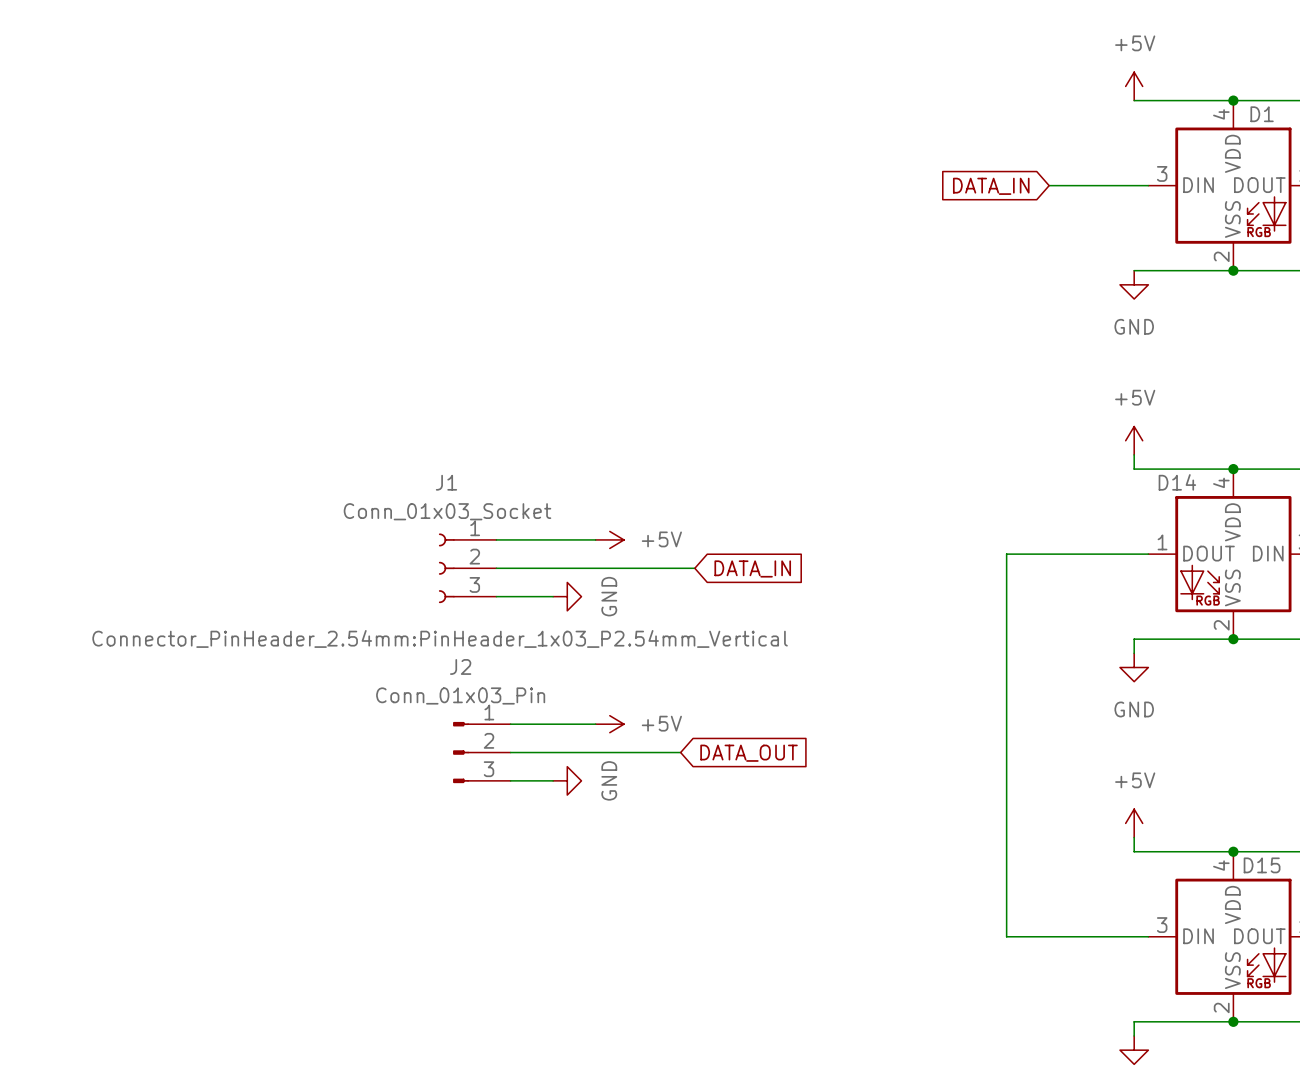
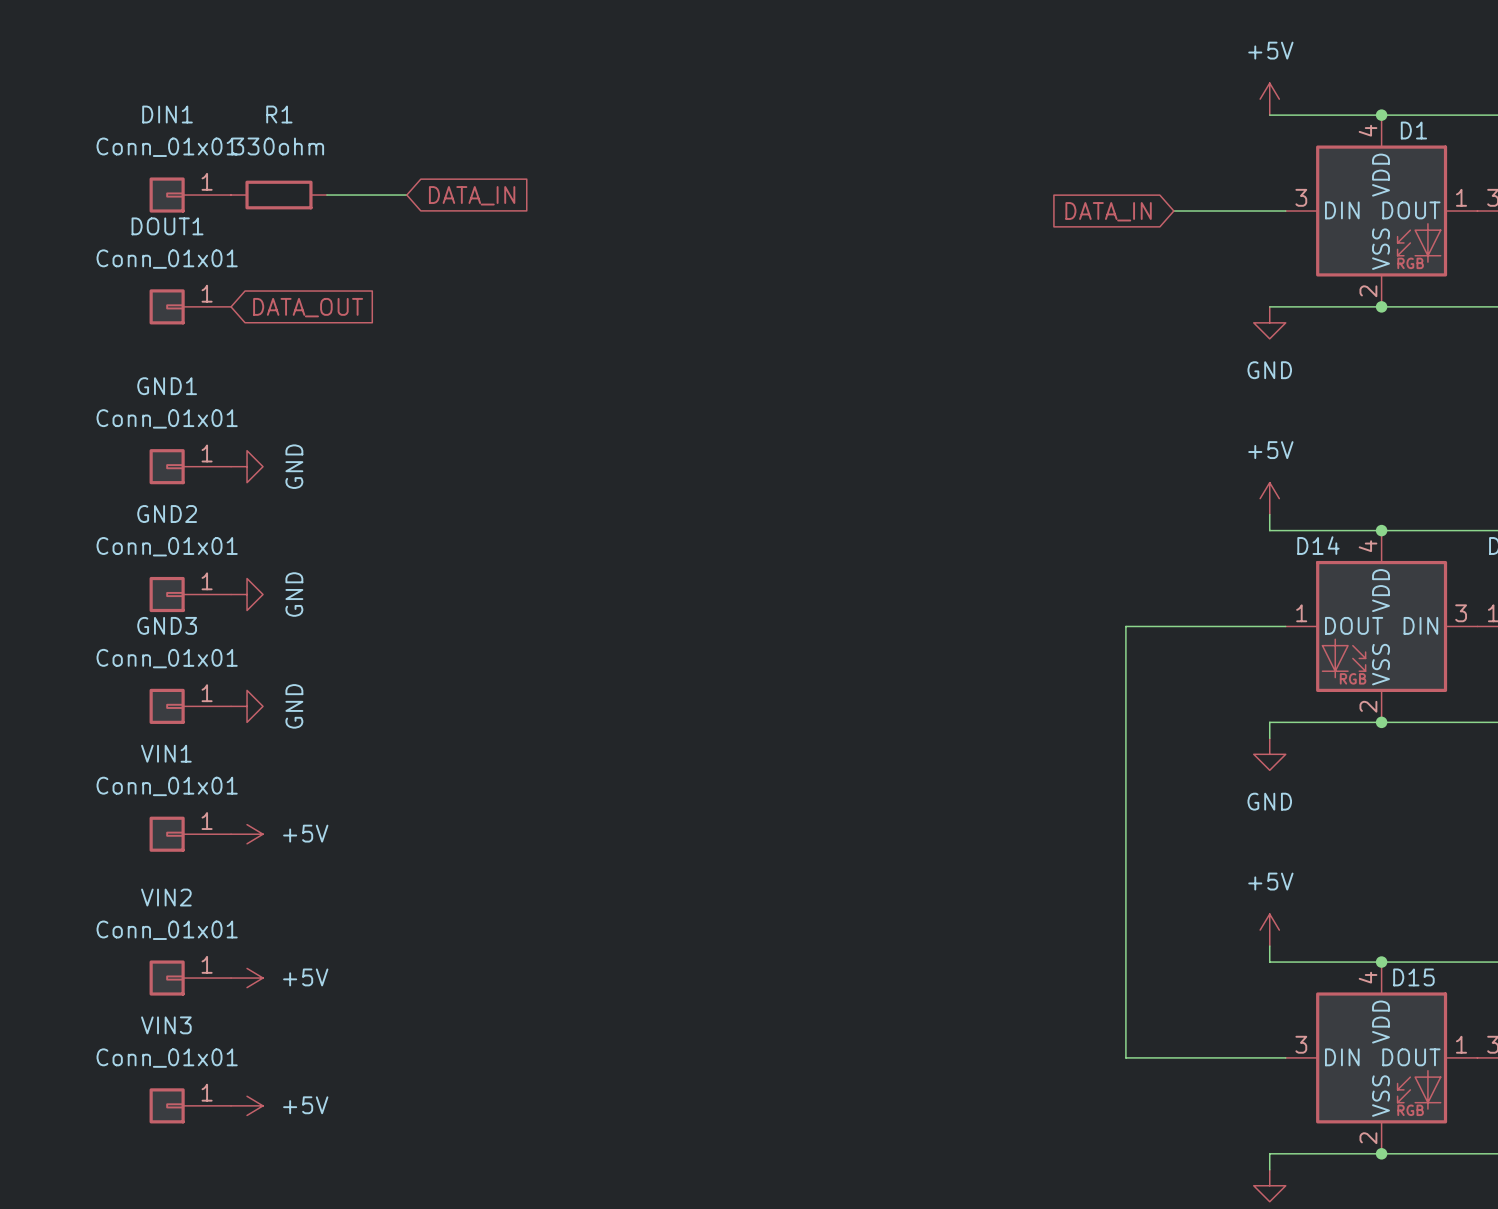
DIN1: none -> Conn_01x01 (190, 195)
R1: none -> 330ohm (278, 195)
wire: none -> (326, 195) (406, 195)
global label: none -> DATA_IN (472, 195)
DOUT1: none -> Conn_01x01 (190, 306)
global label: none -> DATA_OUT (308, 307)
GND1: none -> Conn_01x01 (190, 466)
power symbol: none -> GND (247, 466)
GND2: none -> Conn_01x01 (190, 594)
power symbol: none -> GND (247, 594)
wire: (496, 539) (595, 539) -> none
power symbol: +5V (609, 539) -> none
J1: Conn_01x03_Socket (467, 568) -> none
wire: (496, 568) (694, 568) -> none
global label: DATA_IN (752, 568) -> none
wire: (496, 596) (553, 596) -> none
power symbol: GND (567, 596) -> none
GND3: none -> Conn_01x01 (190, 706)
power symbol: none -> GND (247, 706)
wire: (510, 724) (595, 724) -> none
power symbol: +5V (609, 724) -> none
VIN1: none -> Conn_01x01 (190, 834)
power symbol: none -> +5V (247, 834)
J2: Conn_01x03_Pin (481, 752) -> none
wire: (510, 752) (680, 752) -> none
global label: DATA_OUT (749, 753) -> none
wire: (510, 780) (553, 780) -> none
power symbol: GND (567, 780) -> none
VIN2: none -> Conn_01x01 (190, 978)
power symbol: none -> +5V (247, 978)
VIN3: none -> Conn_01x01 (190, 1105)
power symbol: none -> +5V (247, 1105)

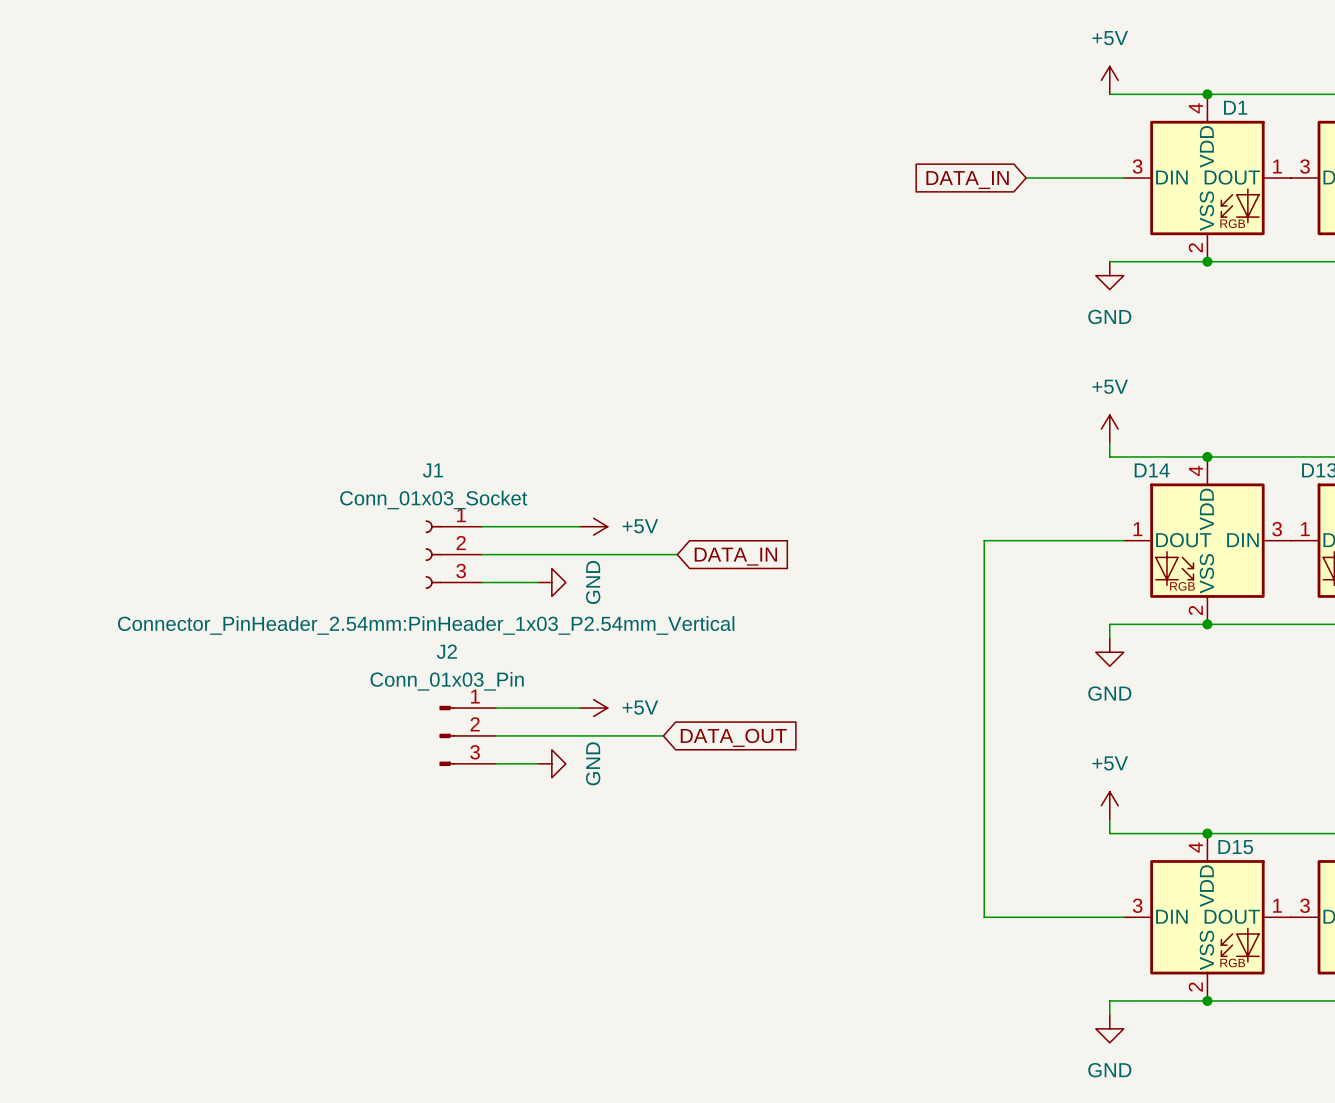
DIN1: Conn_01x01 (190, 195) -> none
R1: 330ohm (278, 195) -> none
wire: (326, 195) (406, 195) -> none
global label: DATA_IN (472, 195) -> none
DOUT1: Conn_01x01 (190, 306) -> none
global label: DATA_OUT (308, 307) -> none
GND1: Conn_01x01 (190, 466) -> none
power symbol: GND (247, 466) -> none
GND2: Conn_01x01 (190, 594) -> none
power symbol: GND (247, 594) -> none
wire: none -> (482, 526) (579, 526)
power symbol: none -> +5V (593, 526)
J1: none -> Conn_01x03_Socket (453, 554)
wire: none -> (482, 554) (677, 554)
global label: none -> DATA_IN (735, 556)
wire: none -> (482, 582) (537, 582)
power symbol: none -> GND (551, 582)
GND3: Conn_01x01 (190, 706) -> none
power symbol: GND (247, 706) -> none
wire: none -> (496, 708) (579, 708)
power symbol: none -> +5V (593, 708)
VIN1: Conn_01x01 (190, 834) -> none
power symbol: +5V (247, 834) -> none
J2: none -> Conn_01x03_Pin (467, 735)
wire: none -> (496, 735) (663, 735)
global label: none -> DATA_OUT (733, 737)
wire: none -> (496, 763) (537, 763)
power symbol: none -> GND (551, 763)
VIN2: Conn_01x01 (190, 978) -> none
power symbol: +5V (247, 978) -> none
VIN3: Conn_01x01 (190, 1105) -> none
power symbol: +5V (247, 1105) -> none

